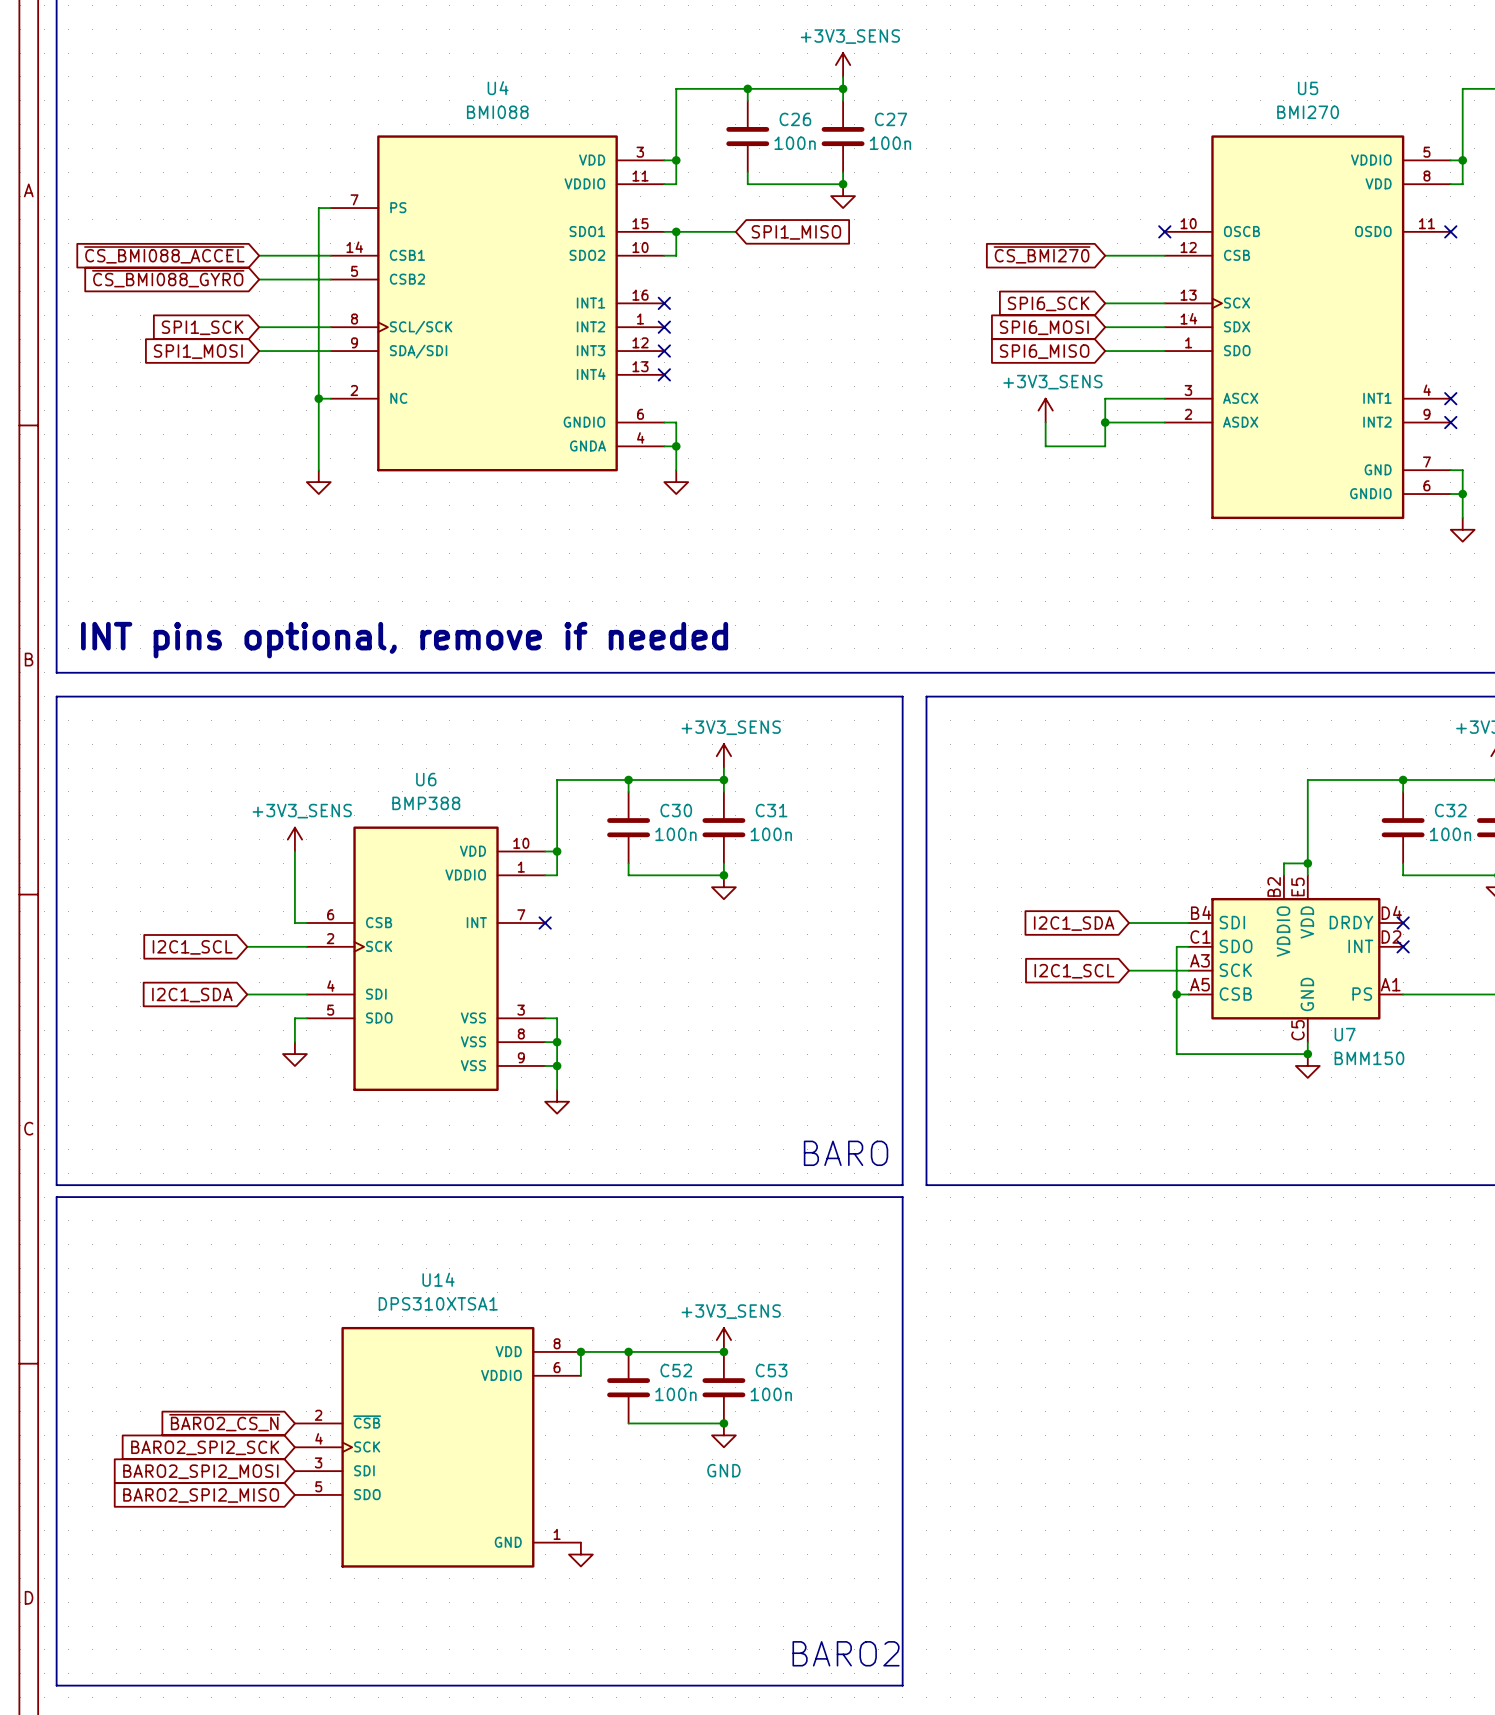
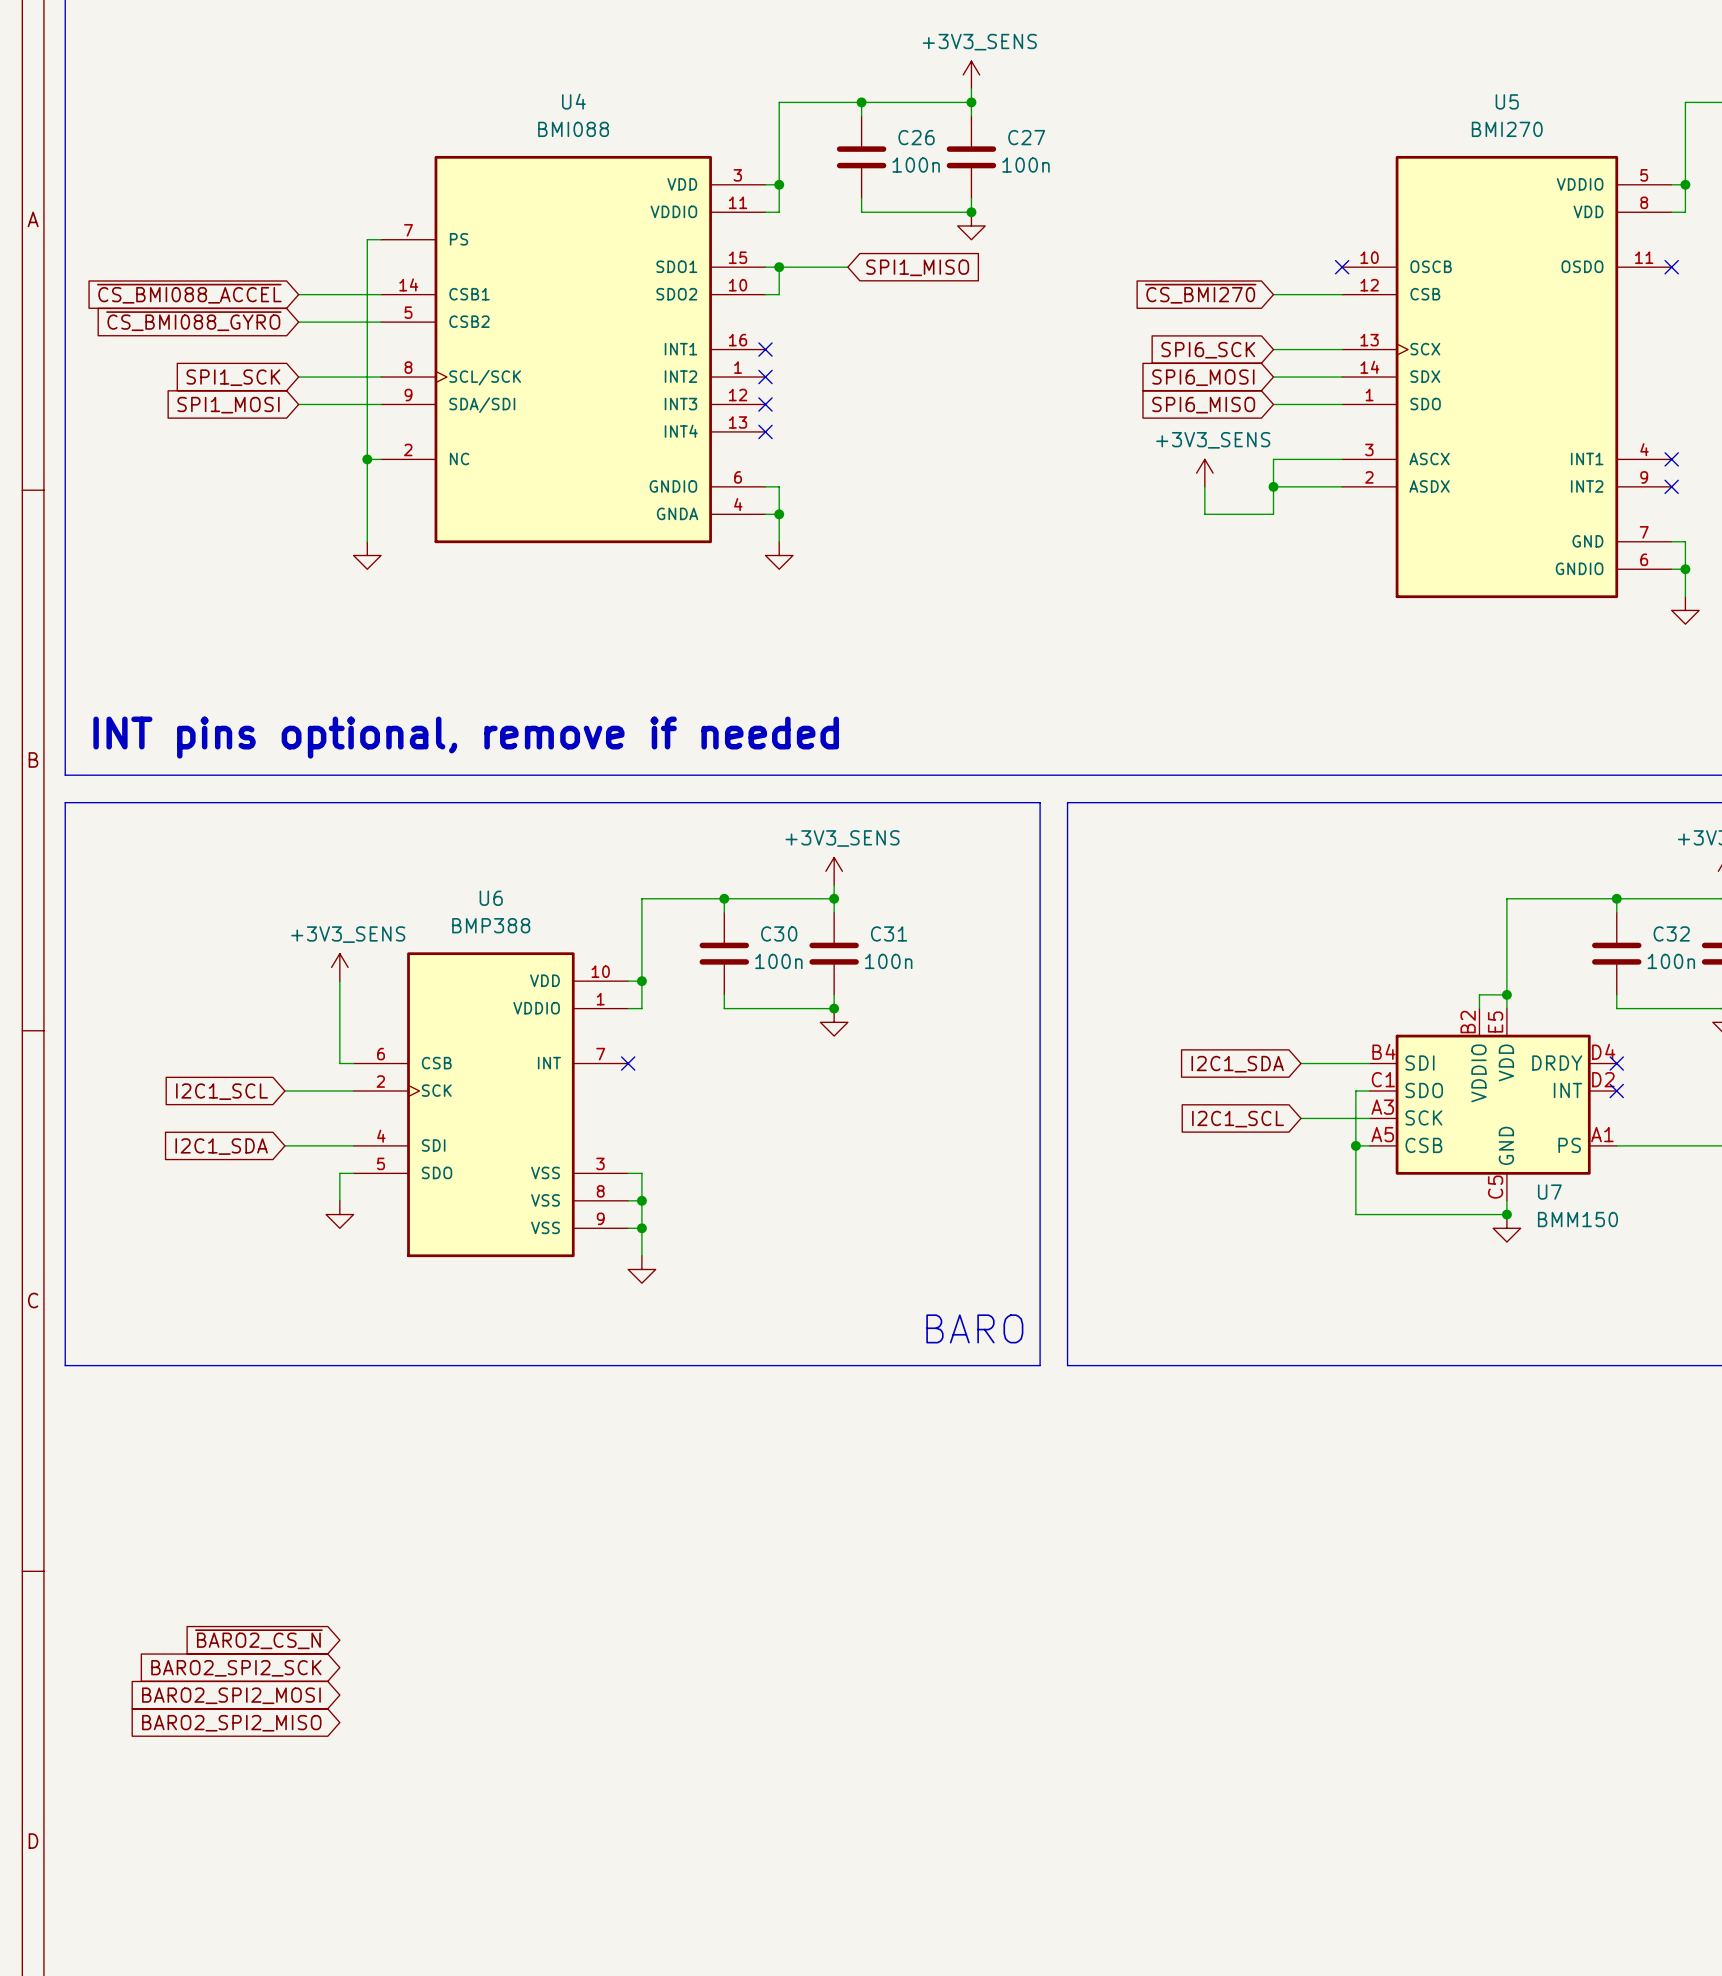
line: (56, 1197) (902, 1197) (902, 1685) (56, 1685) (56, 1197) -> none
power symbol: +3V3_SENS (723, 1340) -> none
junction: (580, 1351) -> none
junction: (628, 1351) -> none
wire: (723, 1351) (580, 1351) (580, 1375) -> none
junction: (723, 1351) -> none
C52: 100n (628, 1387) -> none
C53: 100n (723, 1387) -> none
wire: (628, 1423) (723, 1423) -> none
junction: (723, 1423) -> none
power symbol: GND (723, 1435) -> none
U14: DPS310XTSA1 (437, 1447) -> none
power symbol: (580, 1554) -> none
text: BARO2 (846, 1653) -> none

